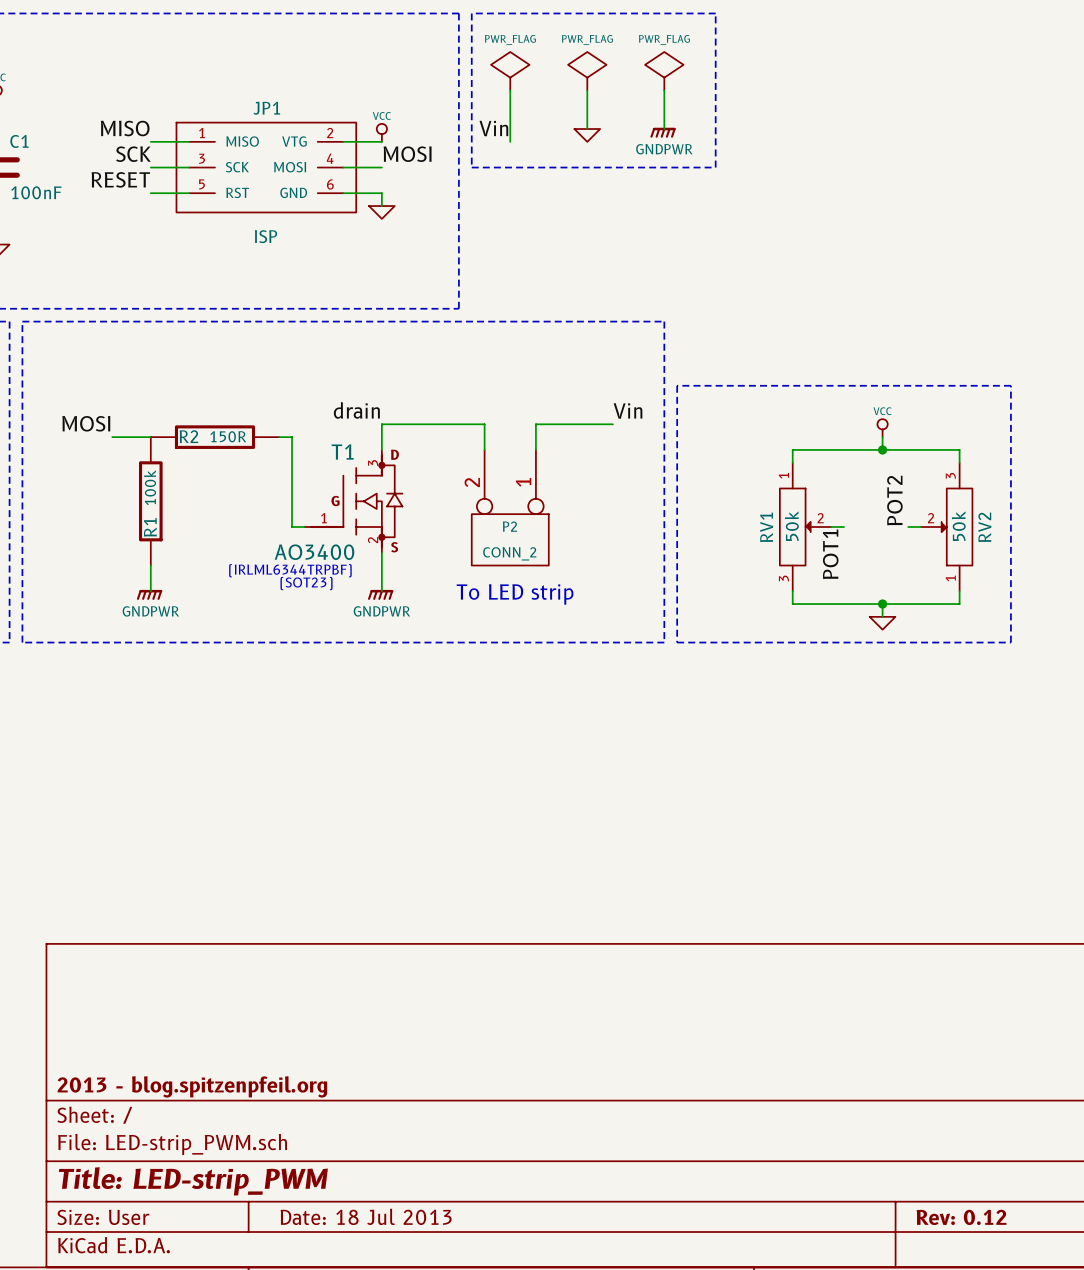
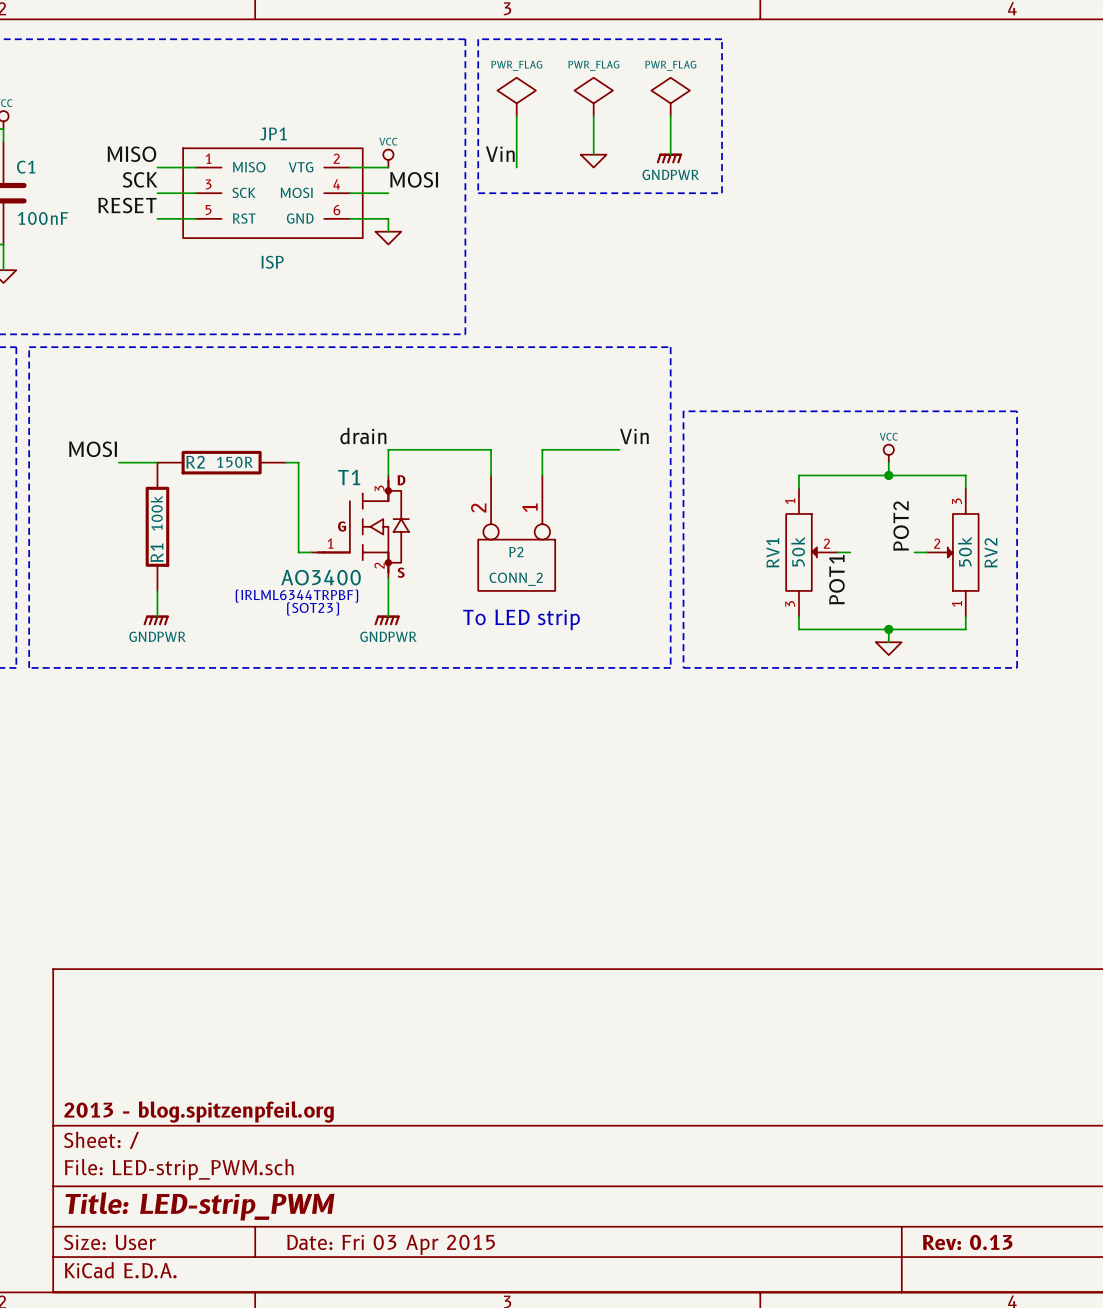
title block: Date: 18 Jul 2013 (366, 1216) -> Date: Fri 03 Apr 2015 (391, 1244)
title block: Rev: 0.12 (961, 1217) -> Rev: 0.13 (967, 1242)

